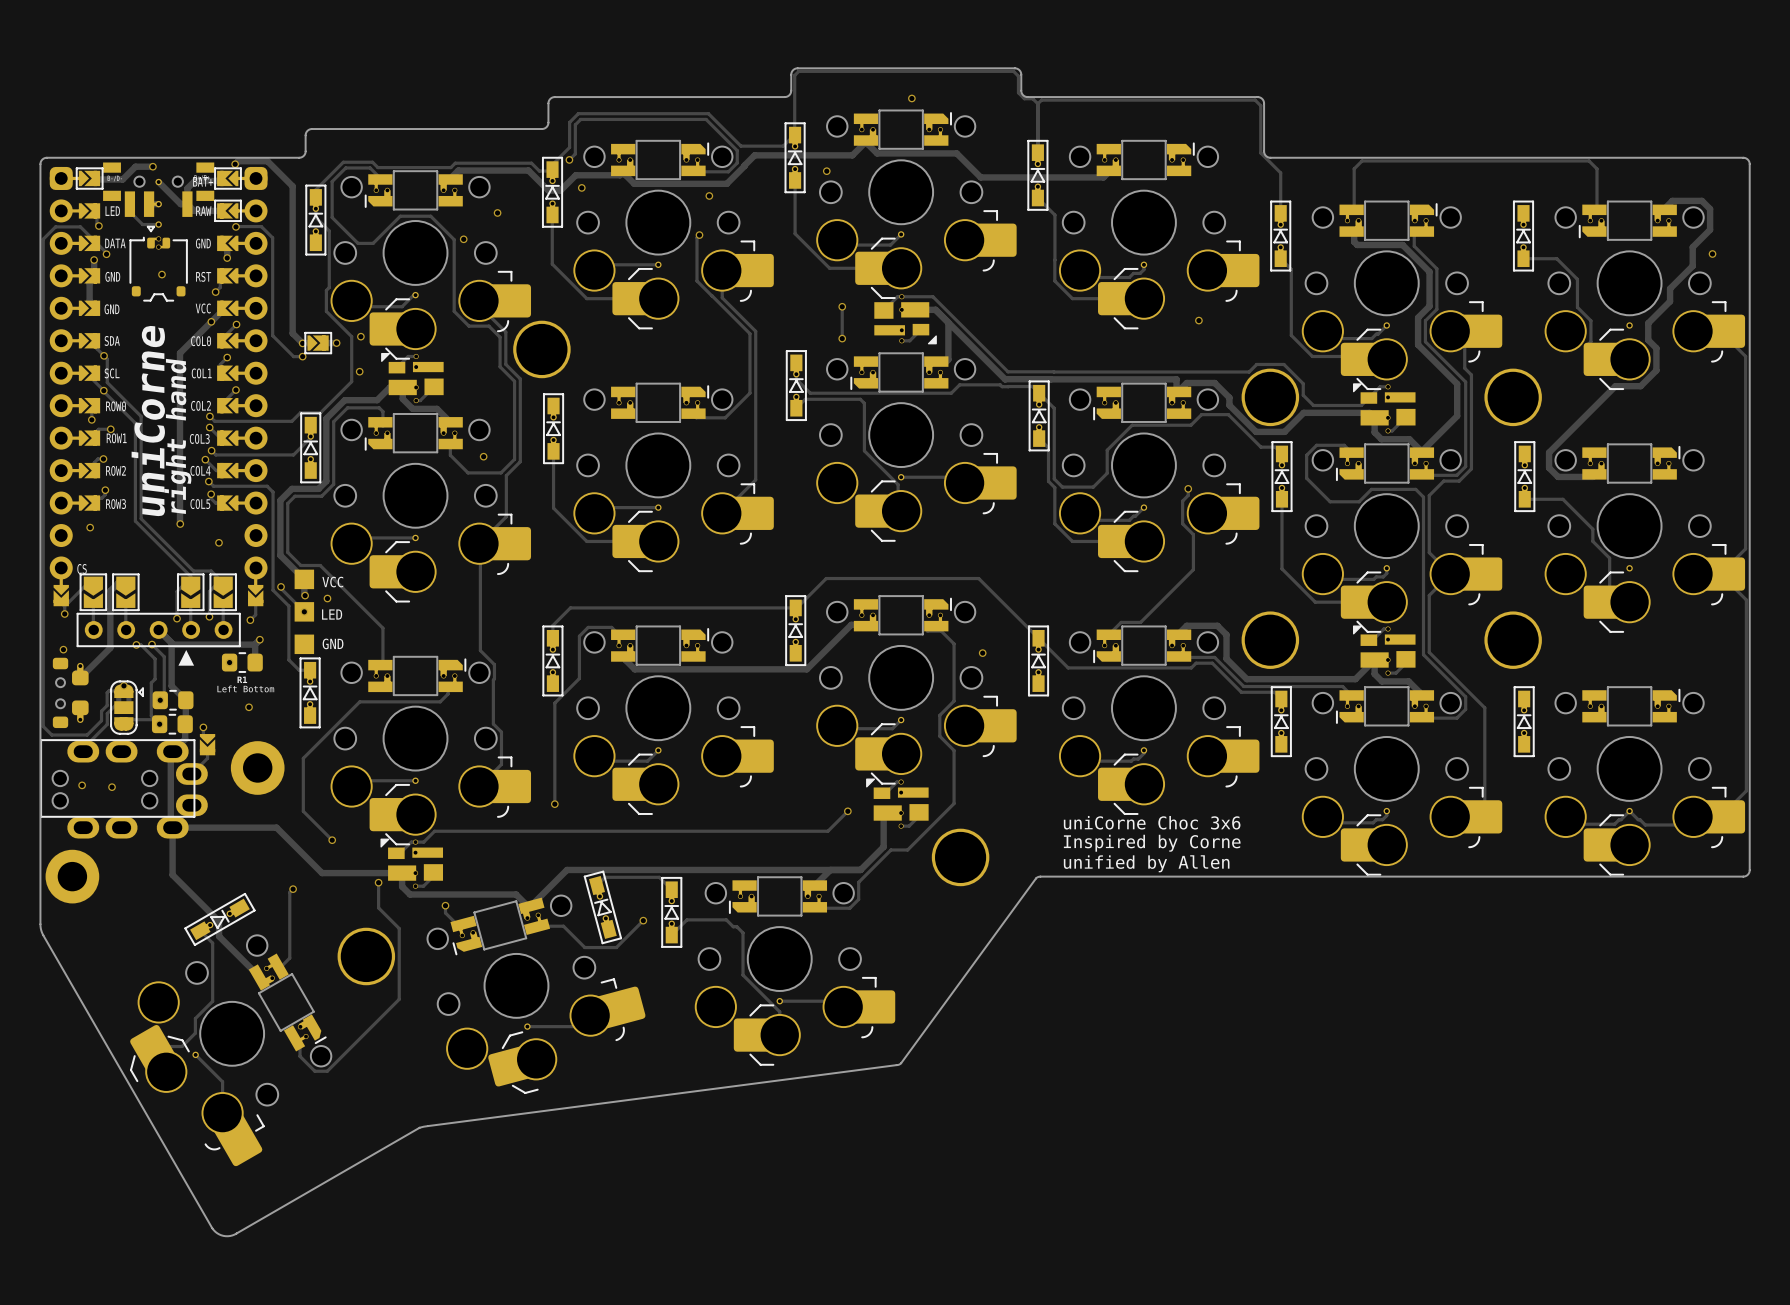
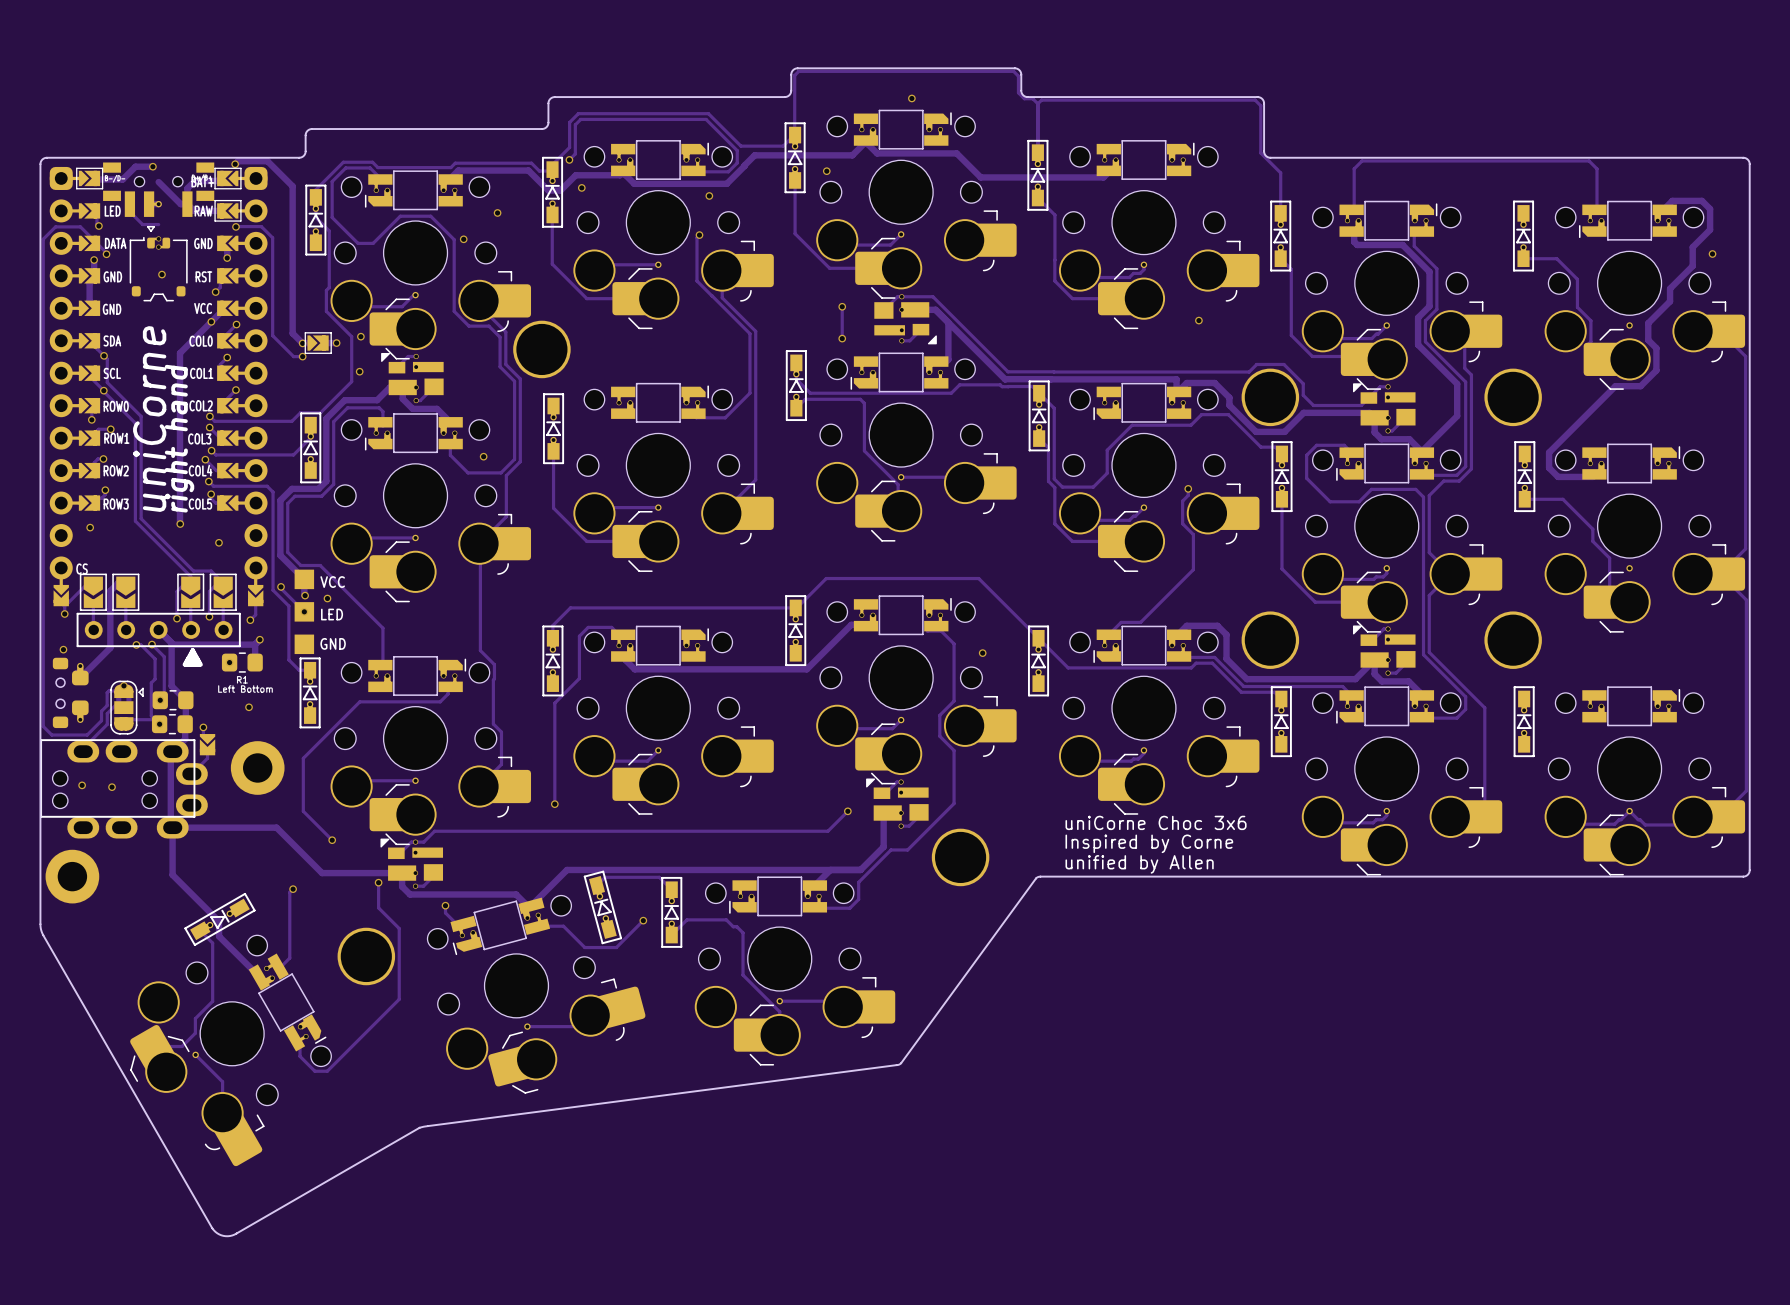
part footprint: [103, 162, 215, 228] -> [103, 162, 215, 217]

